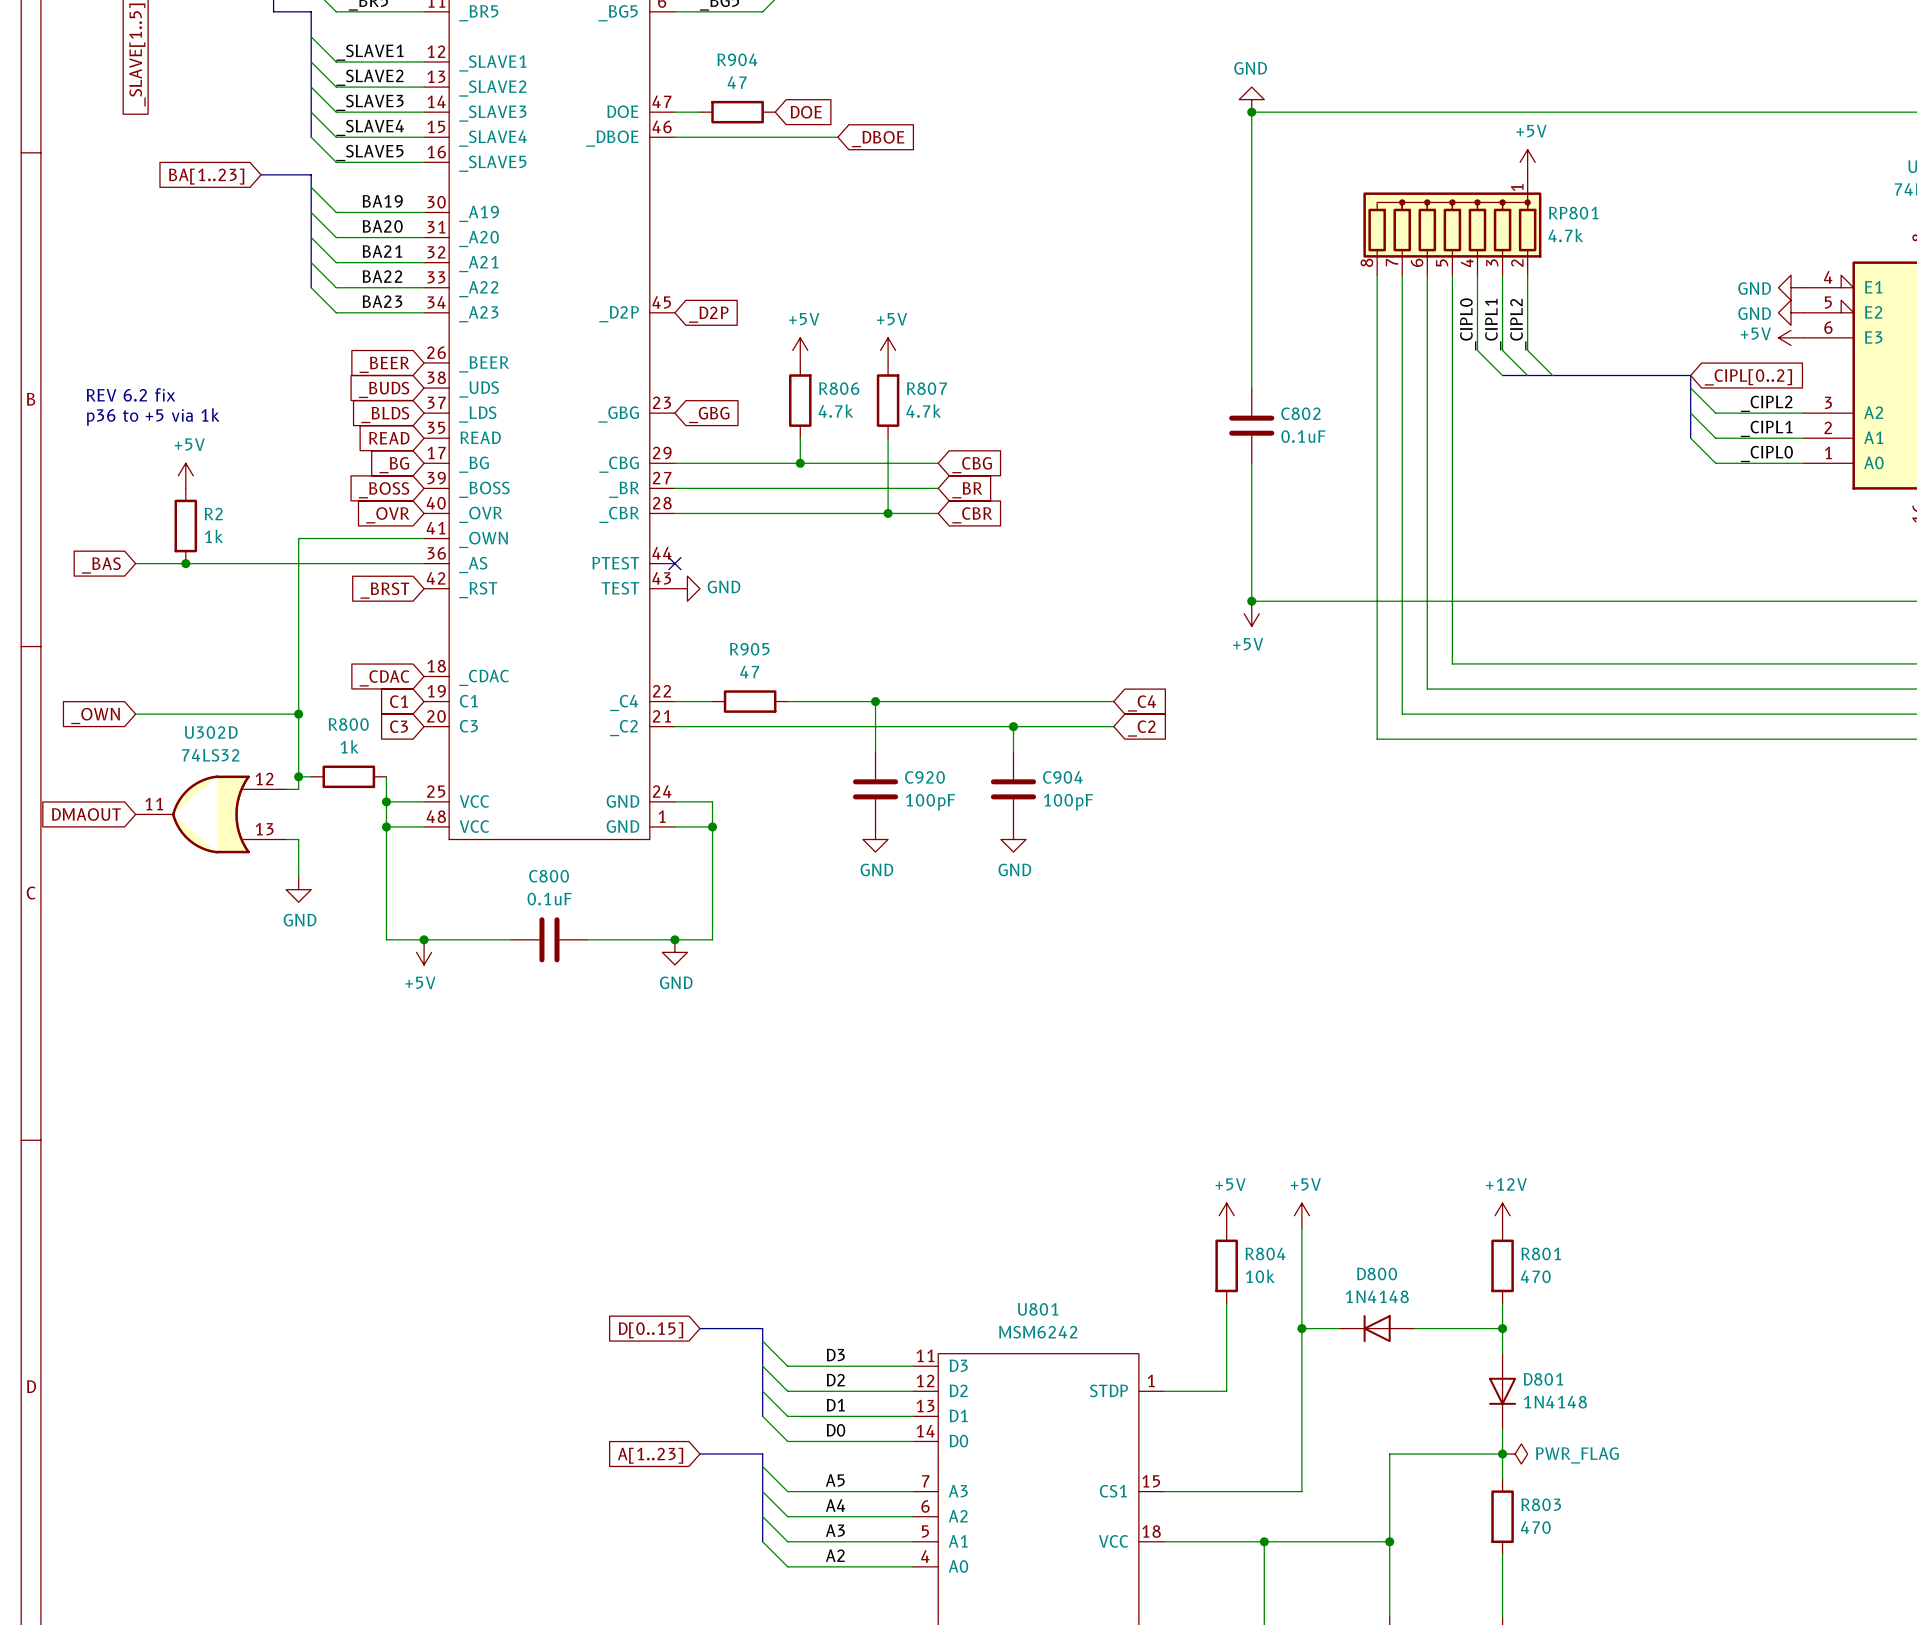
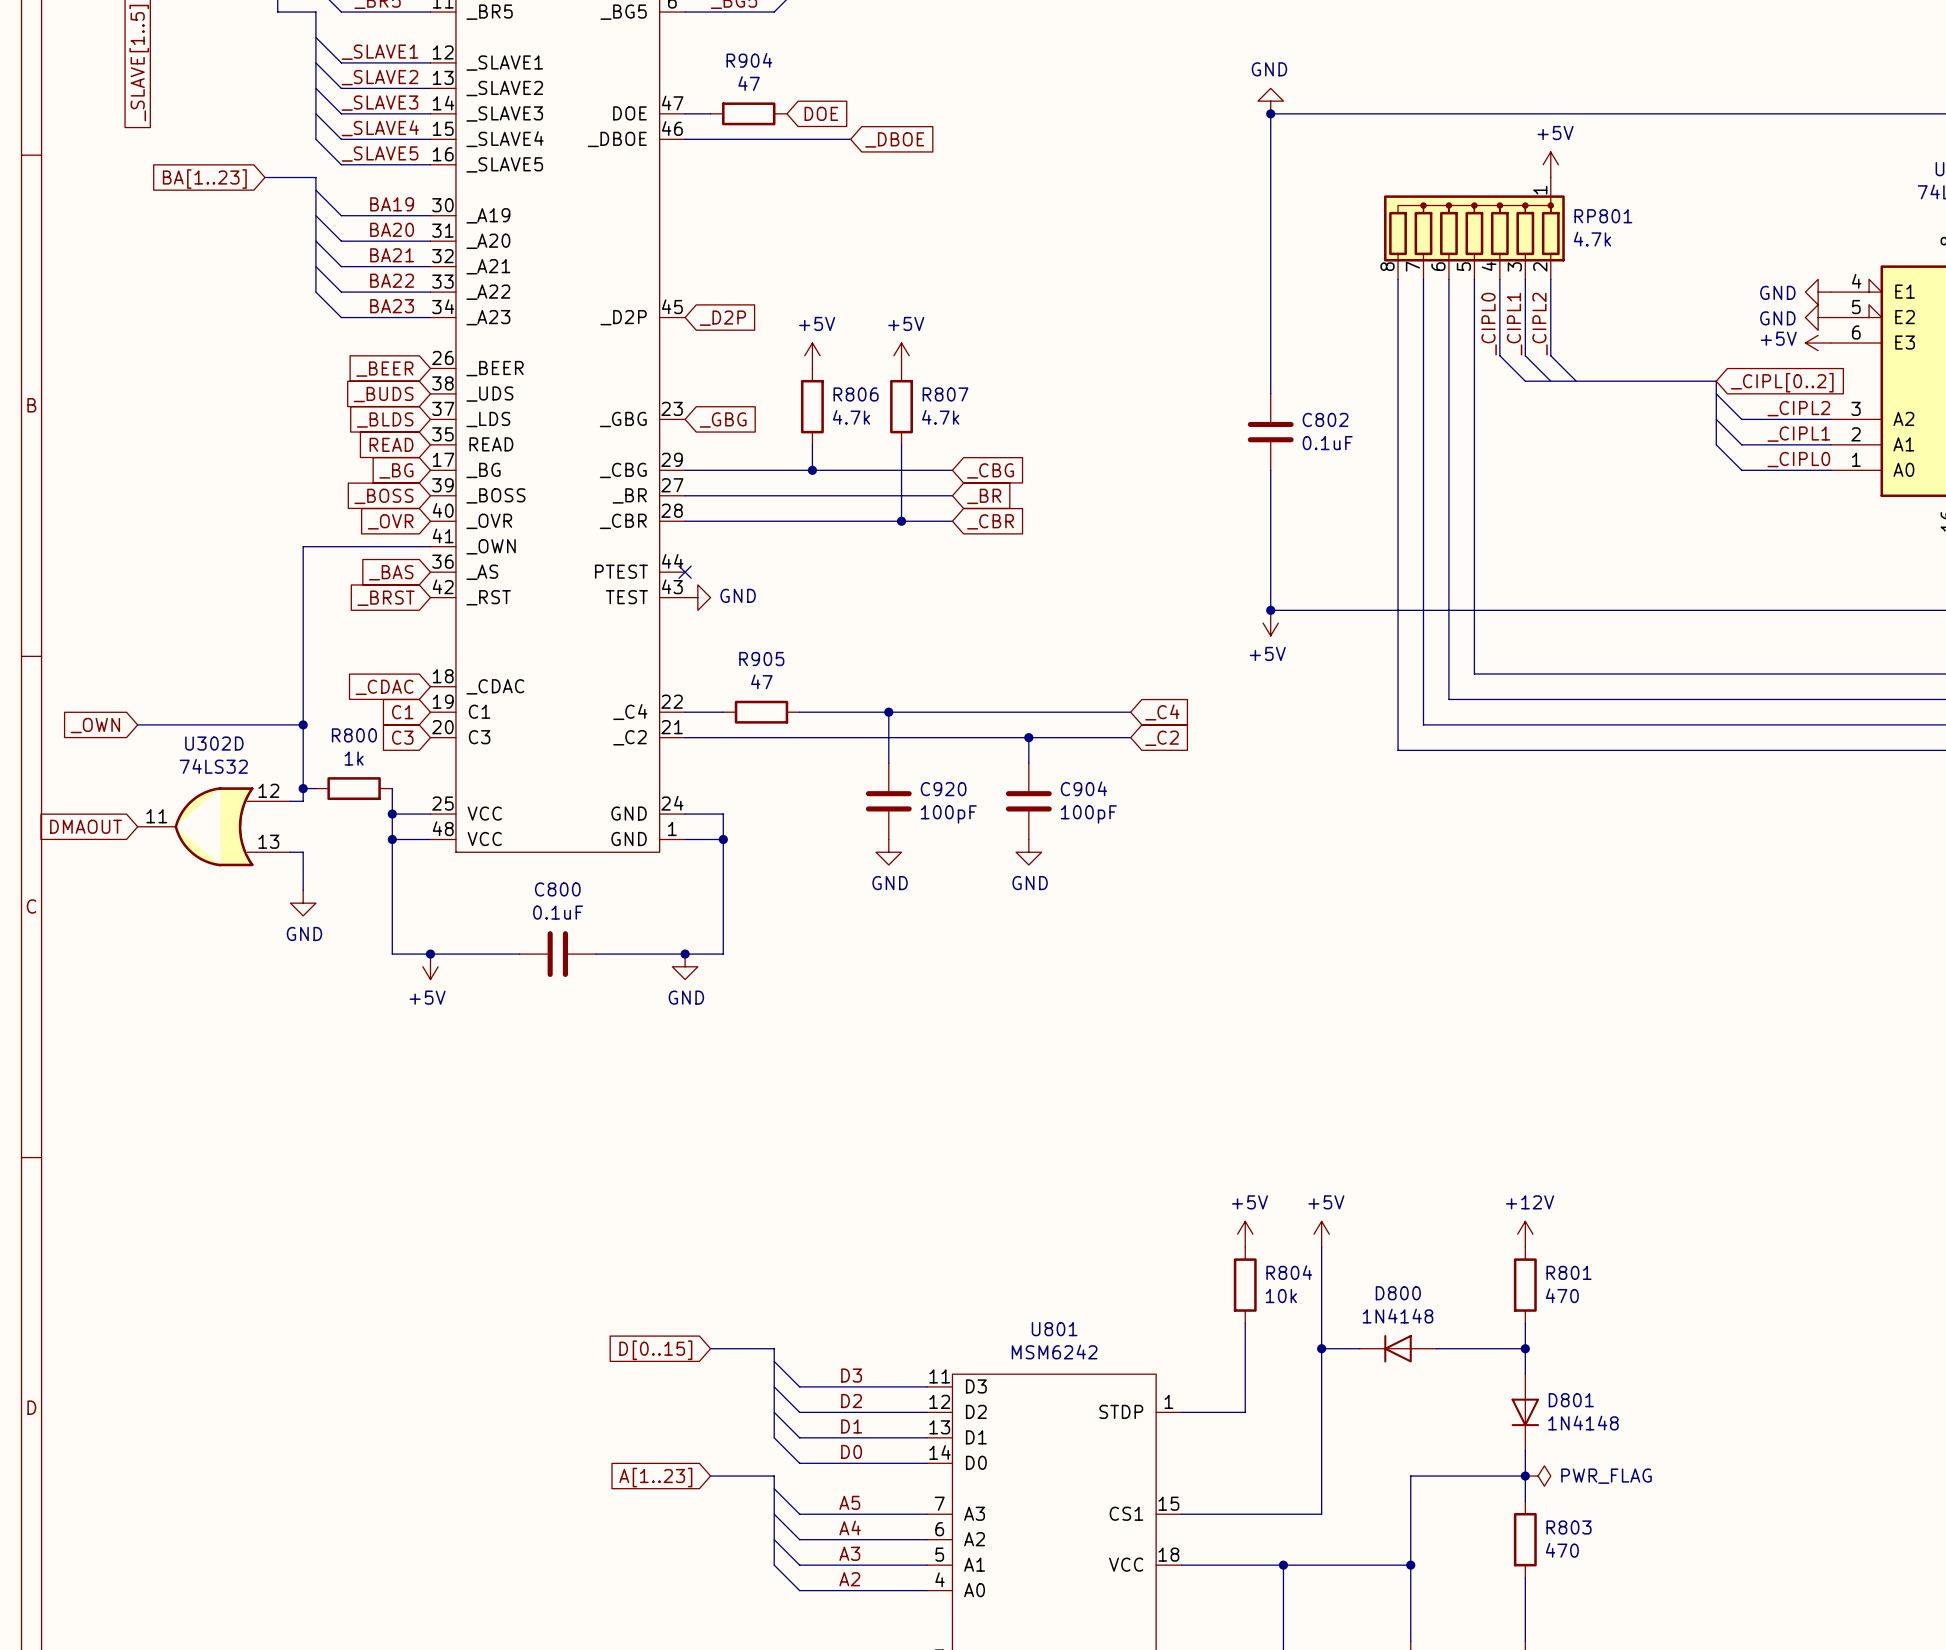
text: REV 6.2 fix (130, 394) -> none
text: p36 to +5 via 1k (153, 417) -> none
power symbol: +5V (185, 475) -> none
R2: 1k (185, 526) -> none
wire: (135, 563) (424, 563) -> none
junction: (185, 563) -> none
global label: _BAS (101, 565) -> none
global label: none -> _BAS (391, 572)

